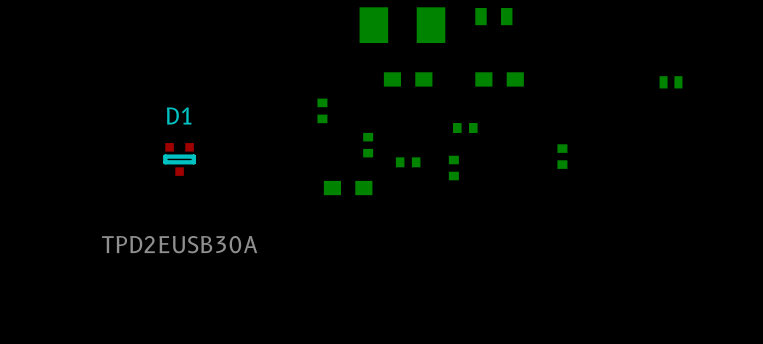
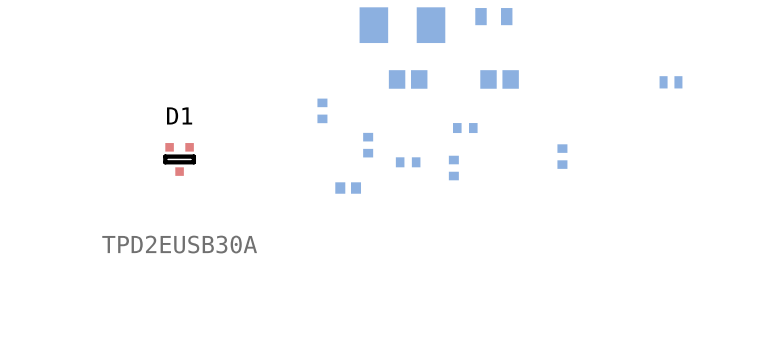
part footprint: [383, 72, 433, 87] -> [388, 70, 428, 89]
part footprint: [475, 72, 524, 87] -> [480, 70, 519, 89]
part footprint: [323, 180, 373, 196] -> [335, 182, 362, 194]

